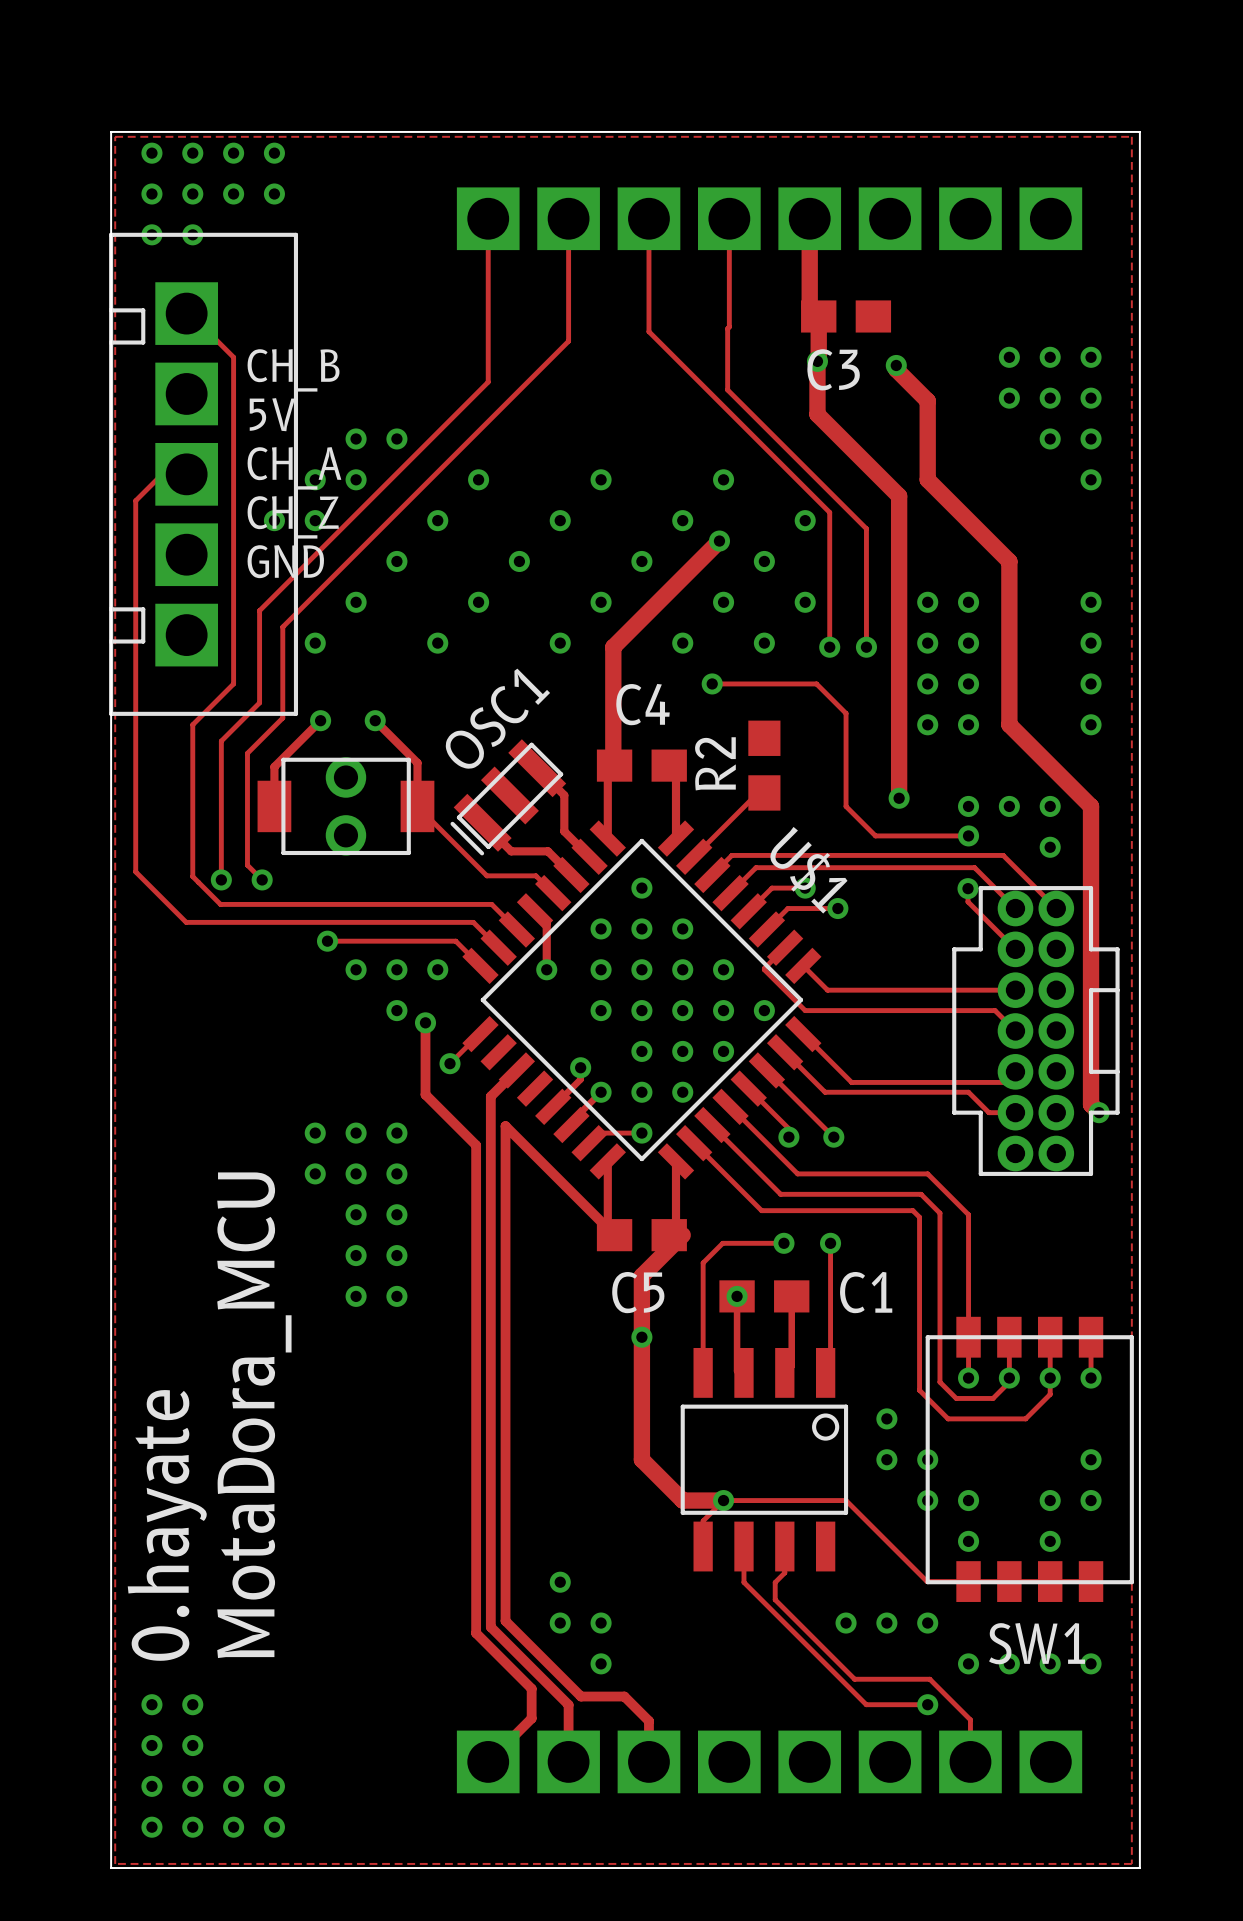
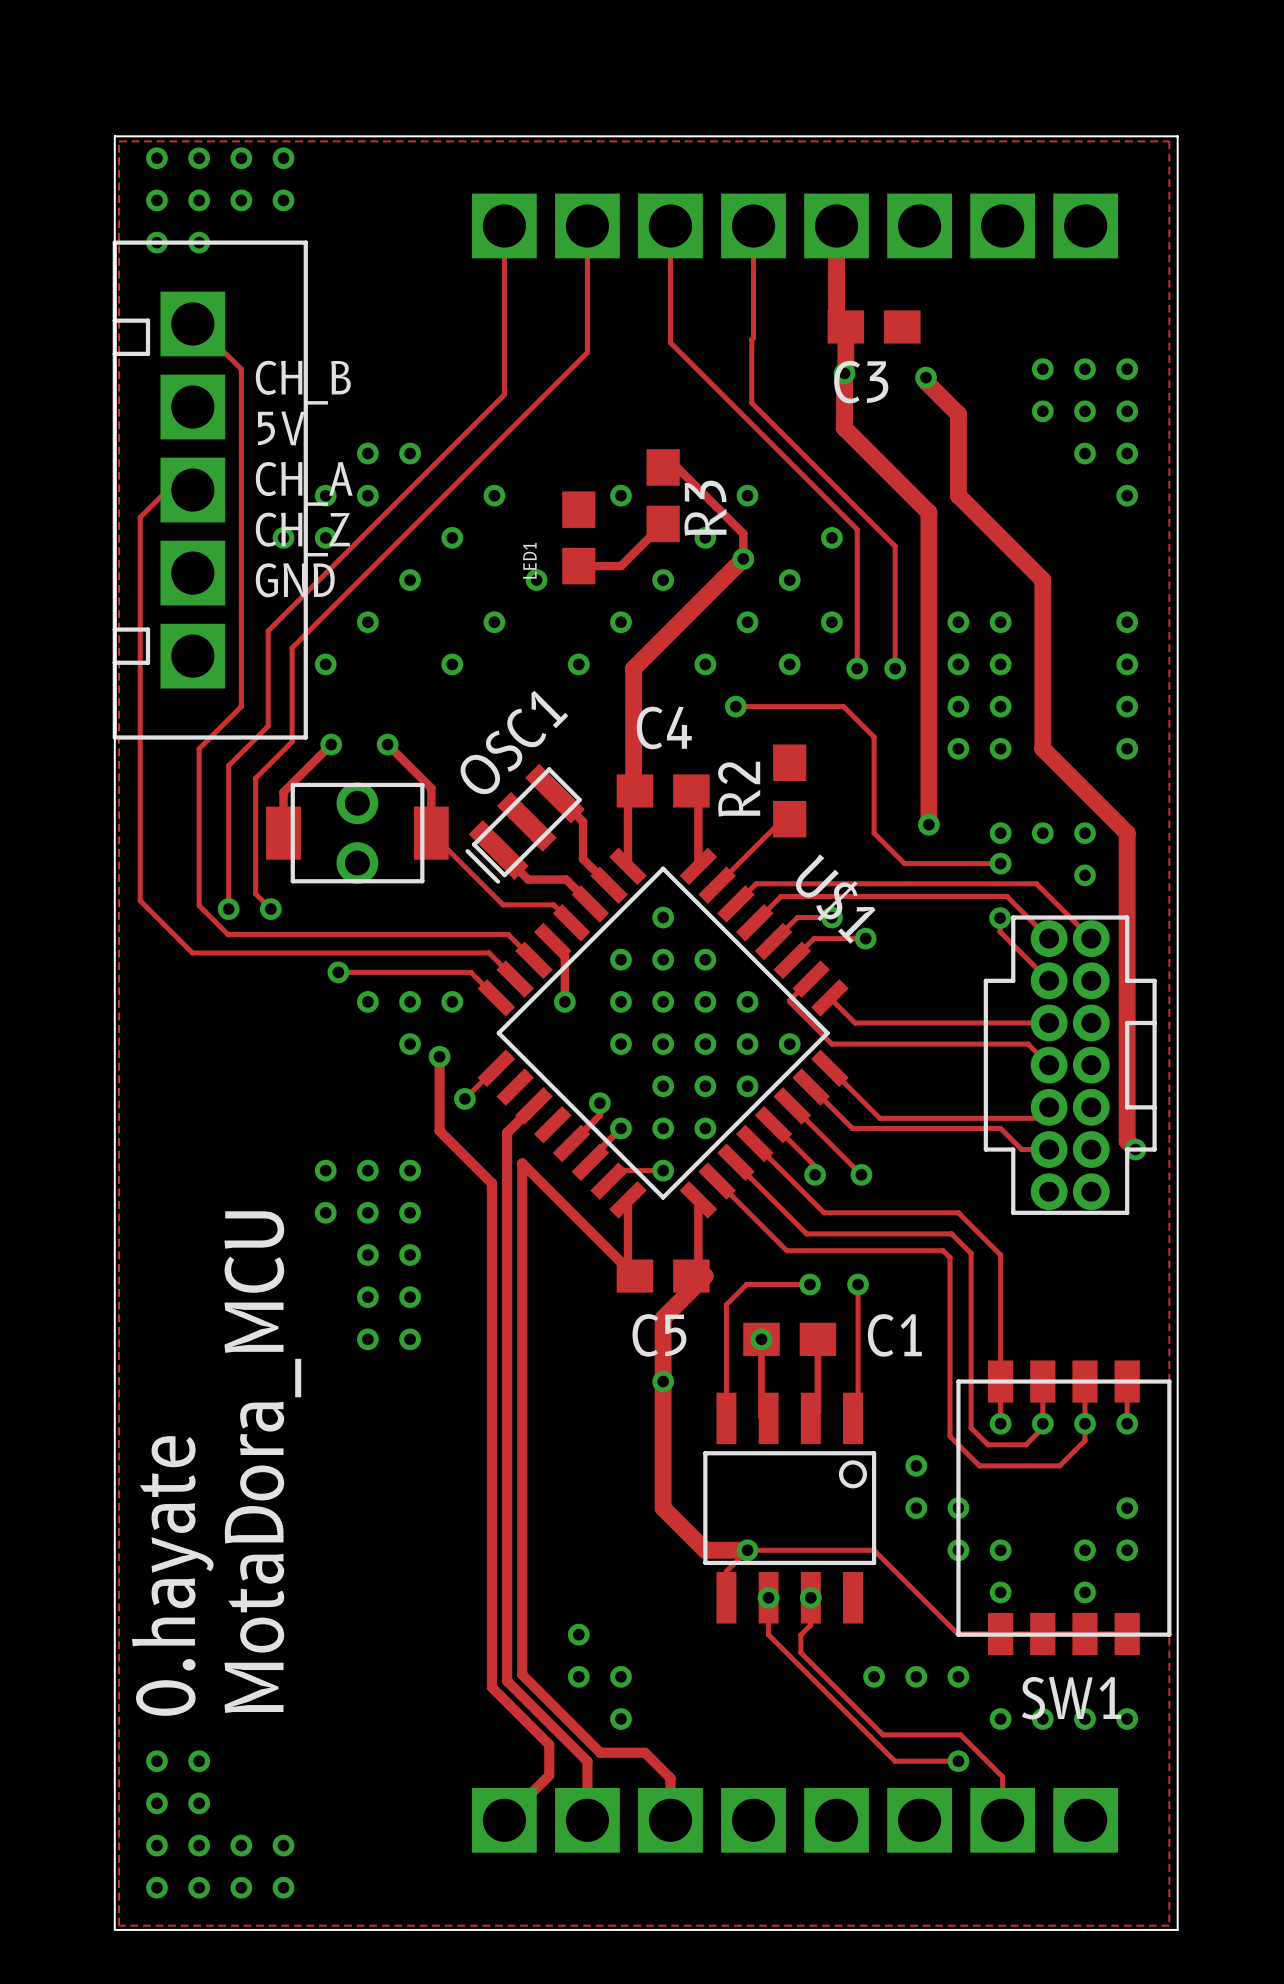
track: none -> (663, 467) (677, 467) (743, 533) (743, 558)
R3: none -> (663, 495)
track: none -> (663, 523) (620, 566) (578, 566)
via: (560, 520) -> none
LED1: none -> (578, 537)
via: none -> (768, 1597)
via: none -> (810, 1597)

